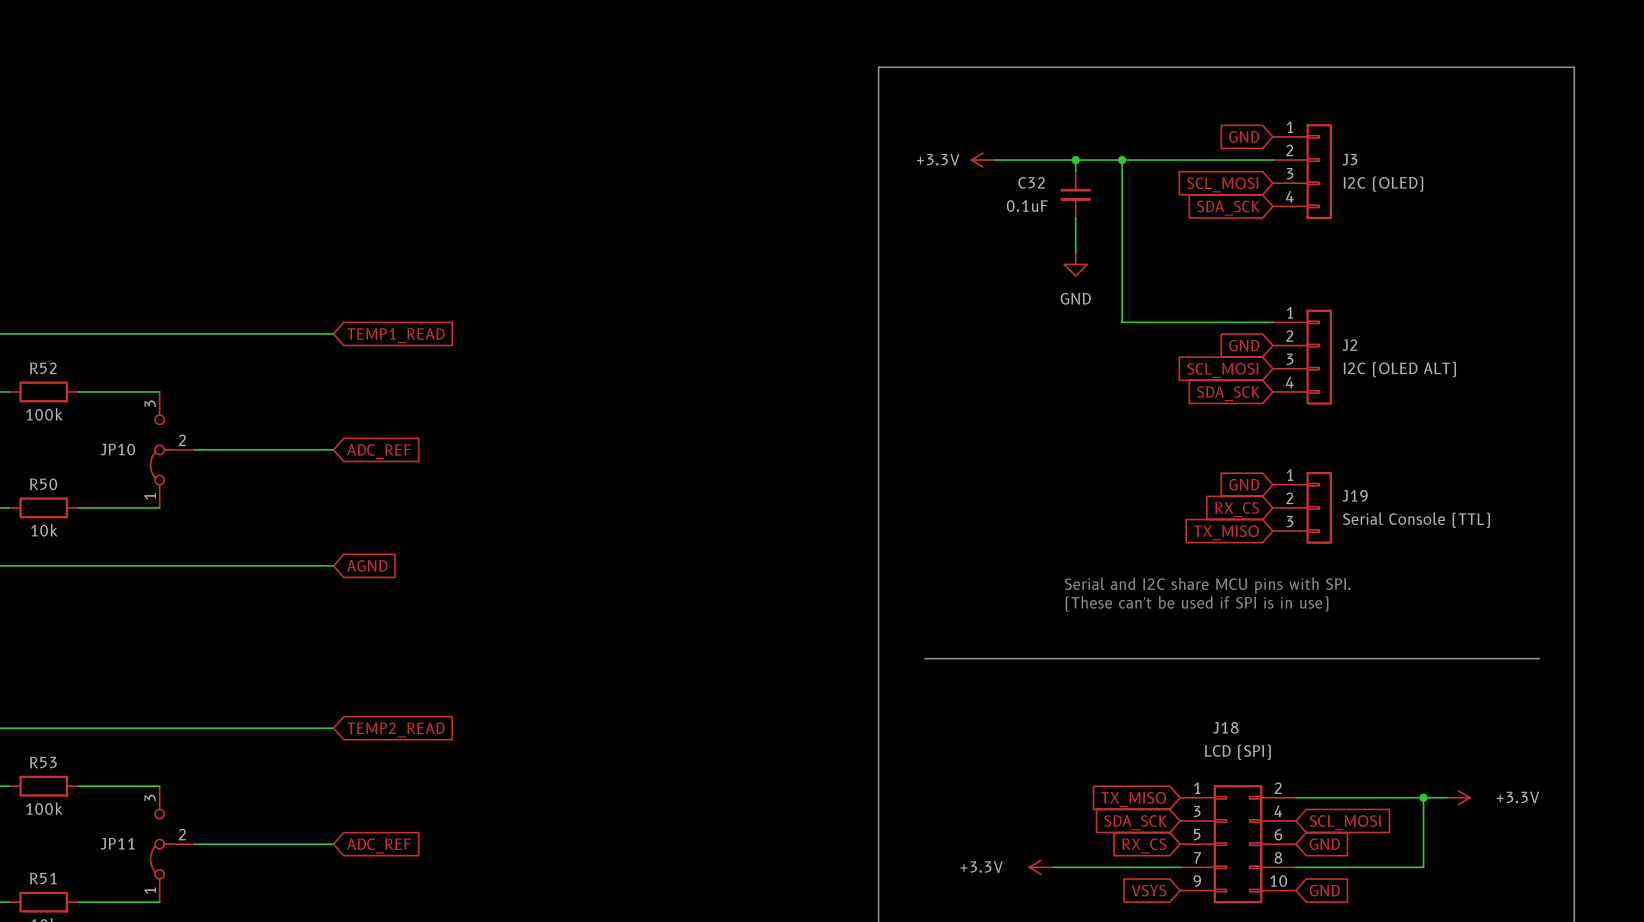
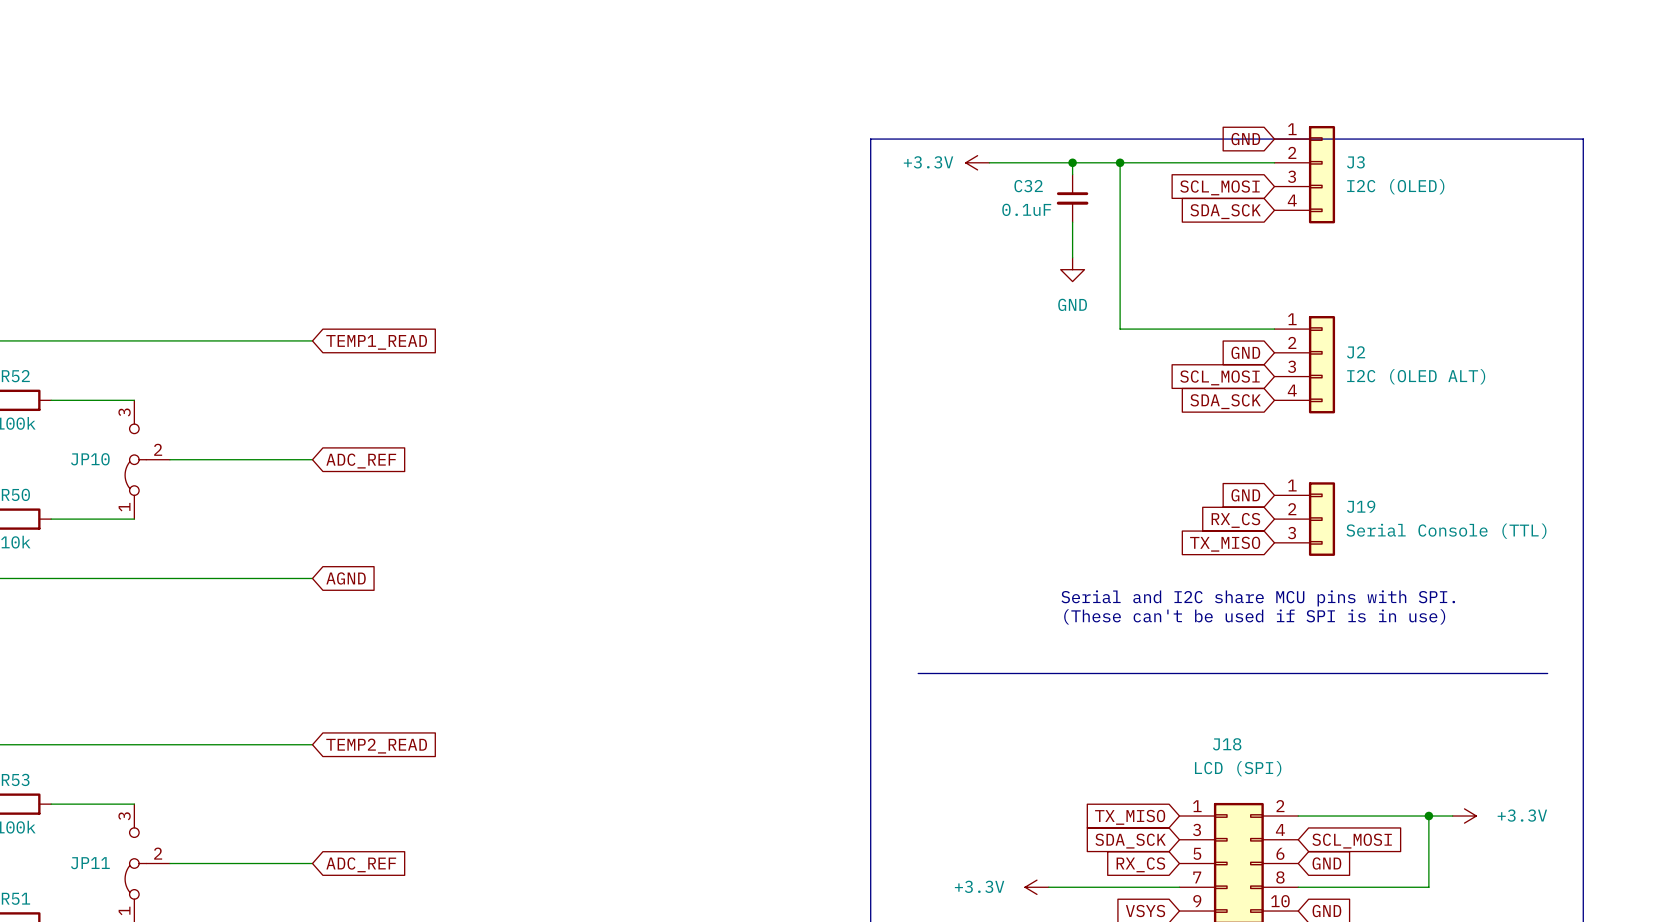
line: (878, 136) (878, 67) (1574, 67) (1574, 136) -> (870, 139) (1583, 139)

